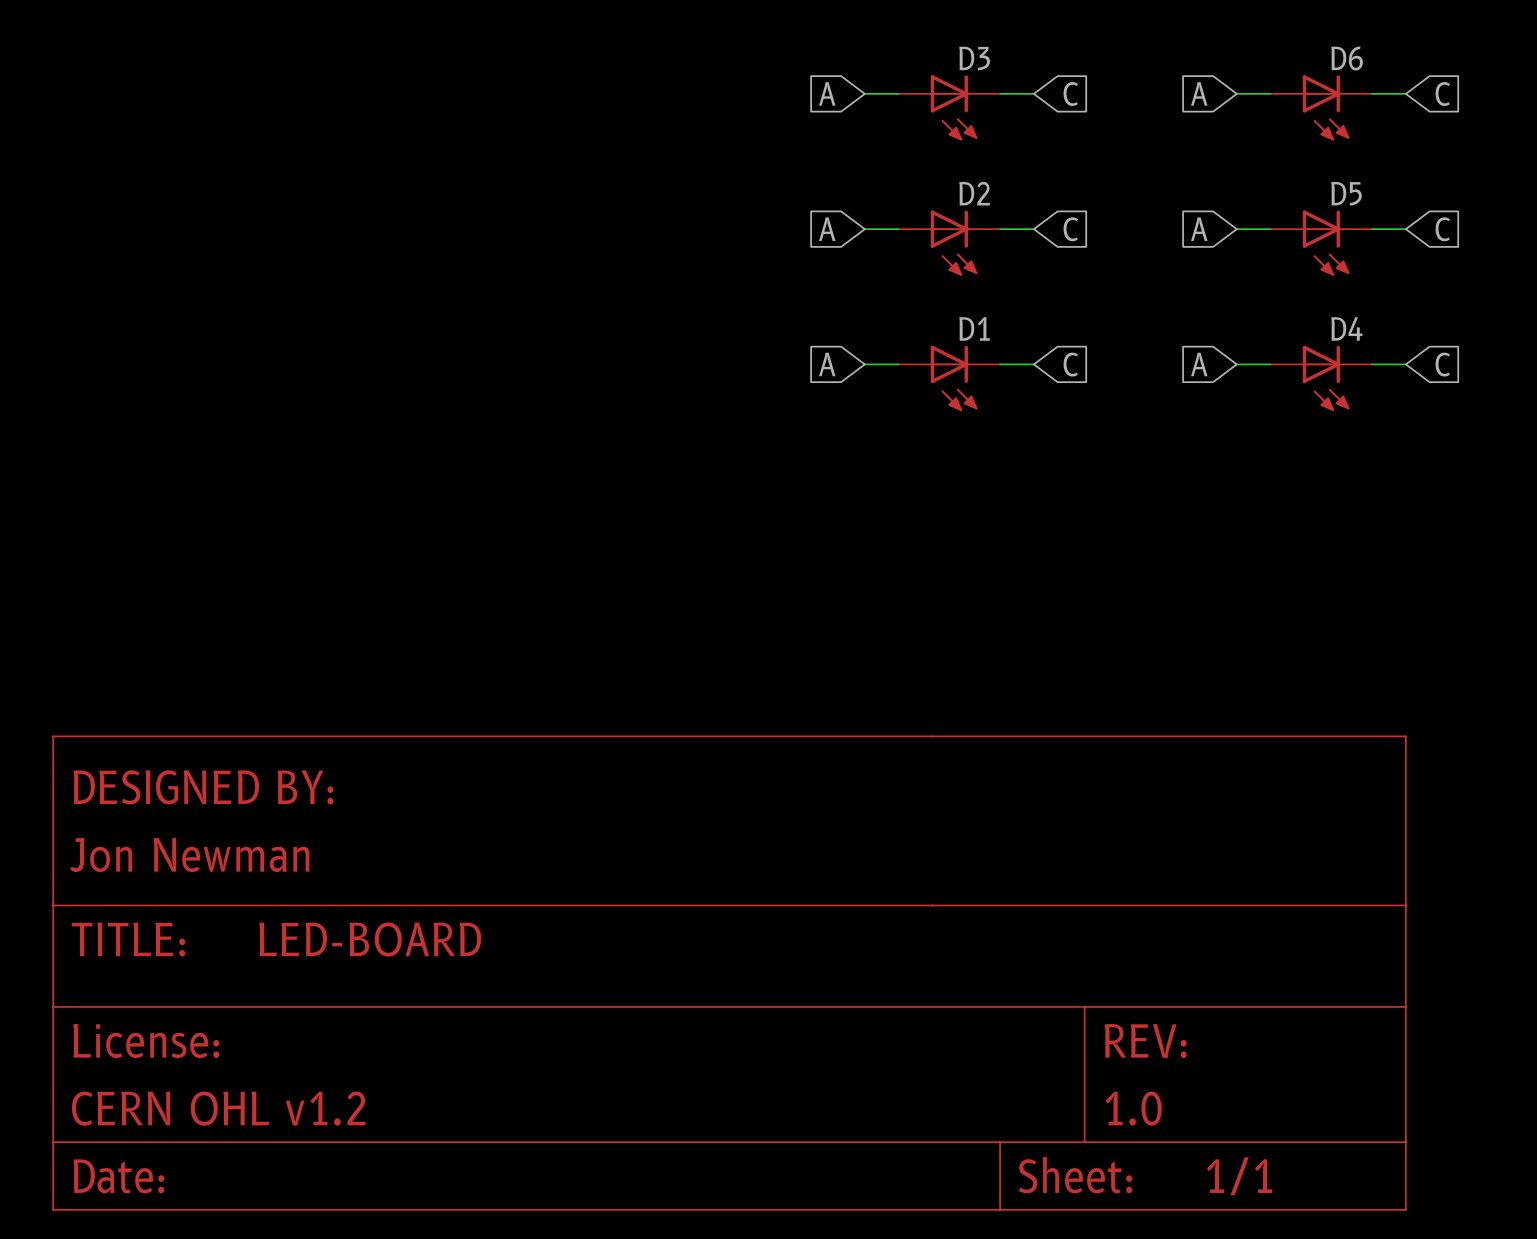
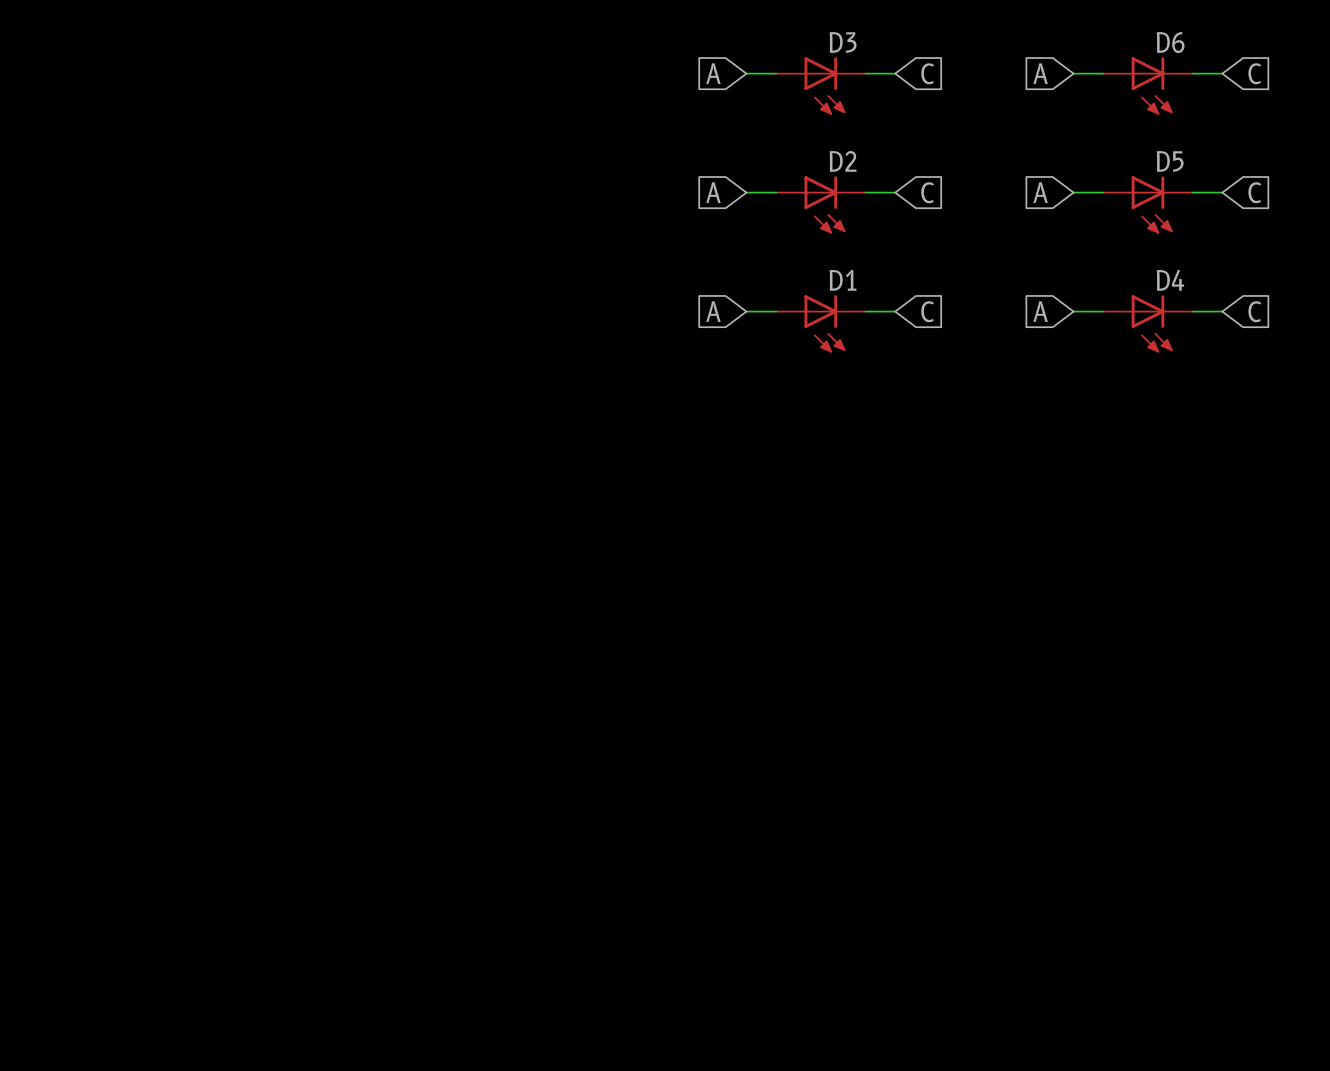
part: (729, 973) -> none

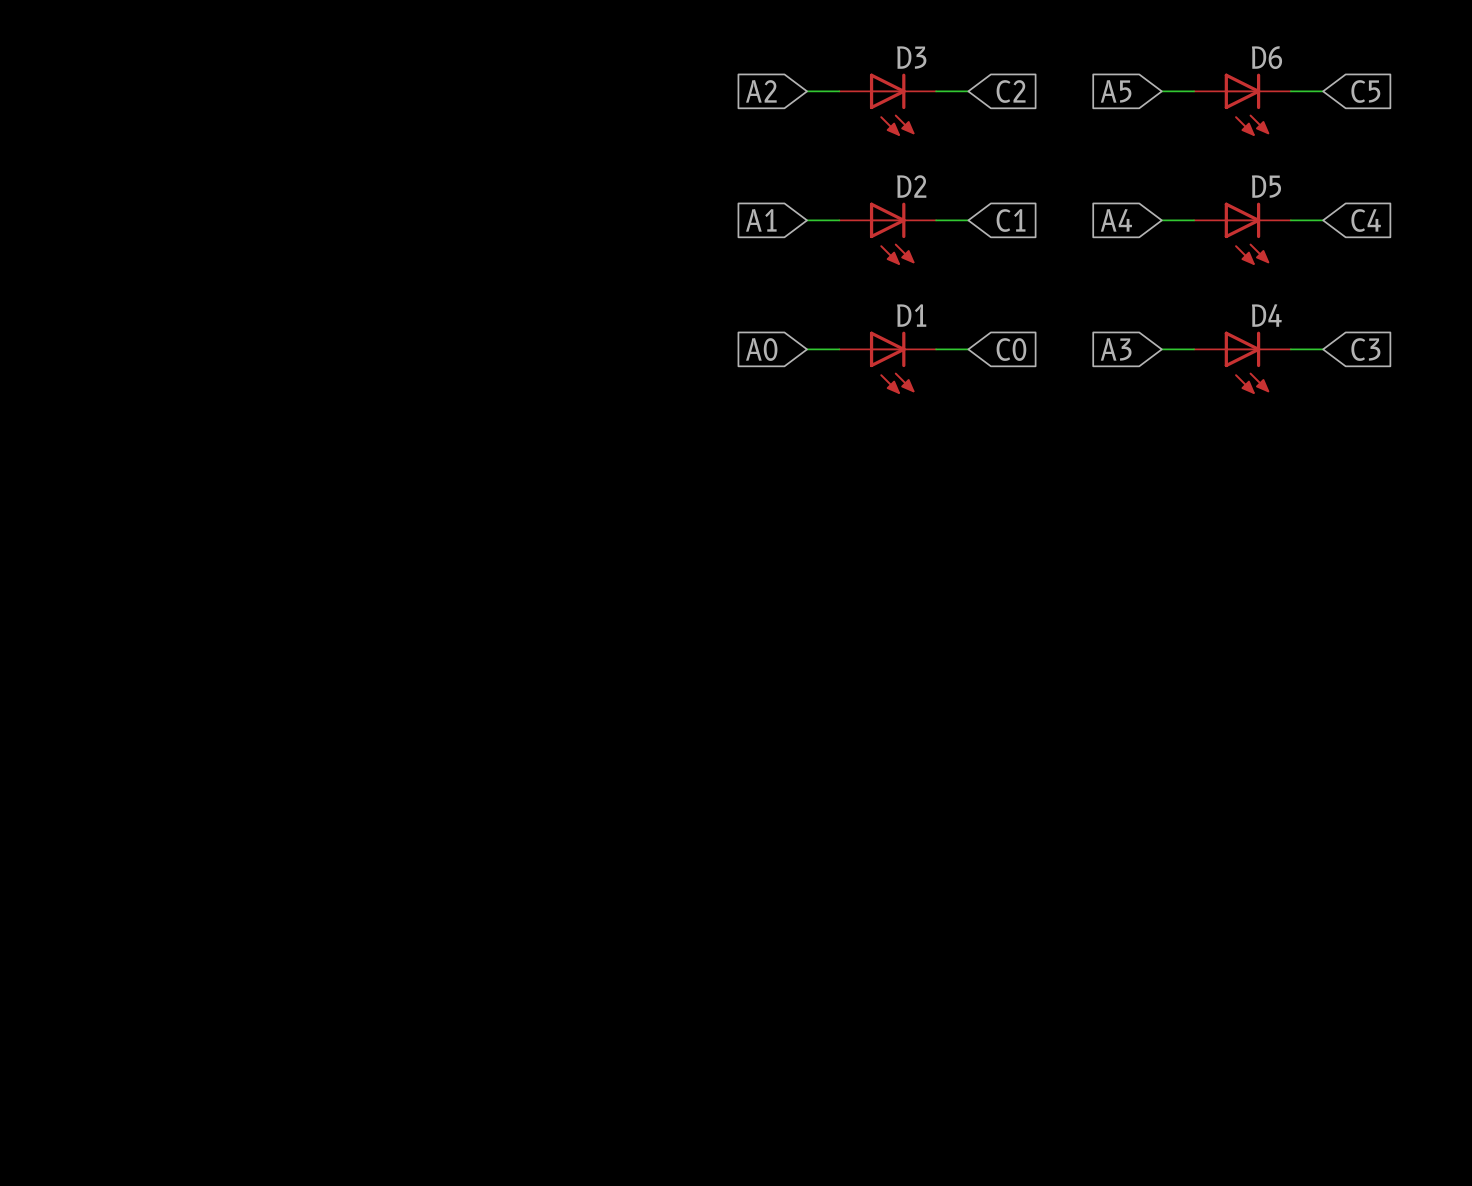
global label: A (713, 73) -> A2 (761, 91)
global label: C (927, 73) -> C2 (1011, 91)
global label: A (1040, 73) -> A5 (1116, 91)
global label: C (1254, 73) -> C5 (1365, 91)
global label: A (713, 192) -> A1 (761, 220)
global label: C (927, 192) -> C1 (1011, 220)
global label: A (1040, 192) -> A4 (1116, 220)
global label: C (1254, 192) -> C4 (1366, 220)
global label: A (713, 311) -> A0 (761, 349)
global label: C (927, 311) -> C0 (1011, 349)
global label: A (1040, 311) -> A3 (1116, 349)
global label: C (1254, 311) -> C3 (1365, 349)

